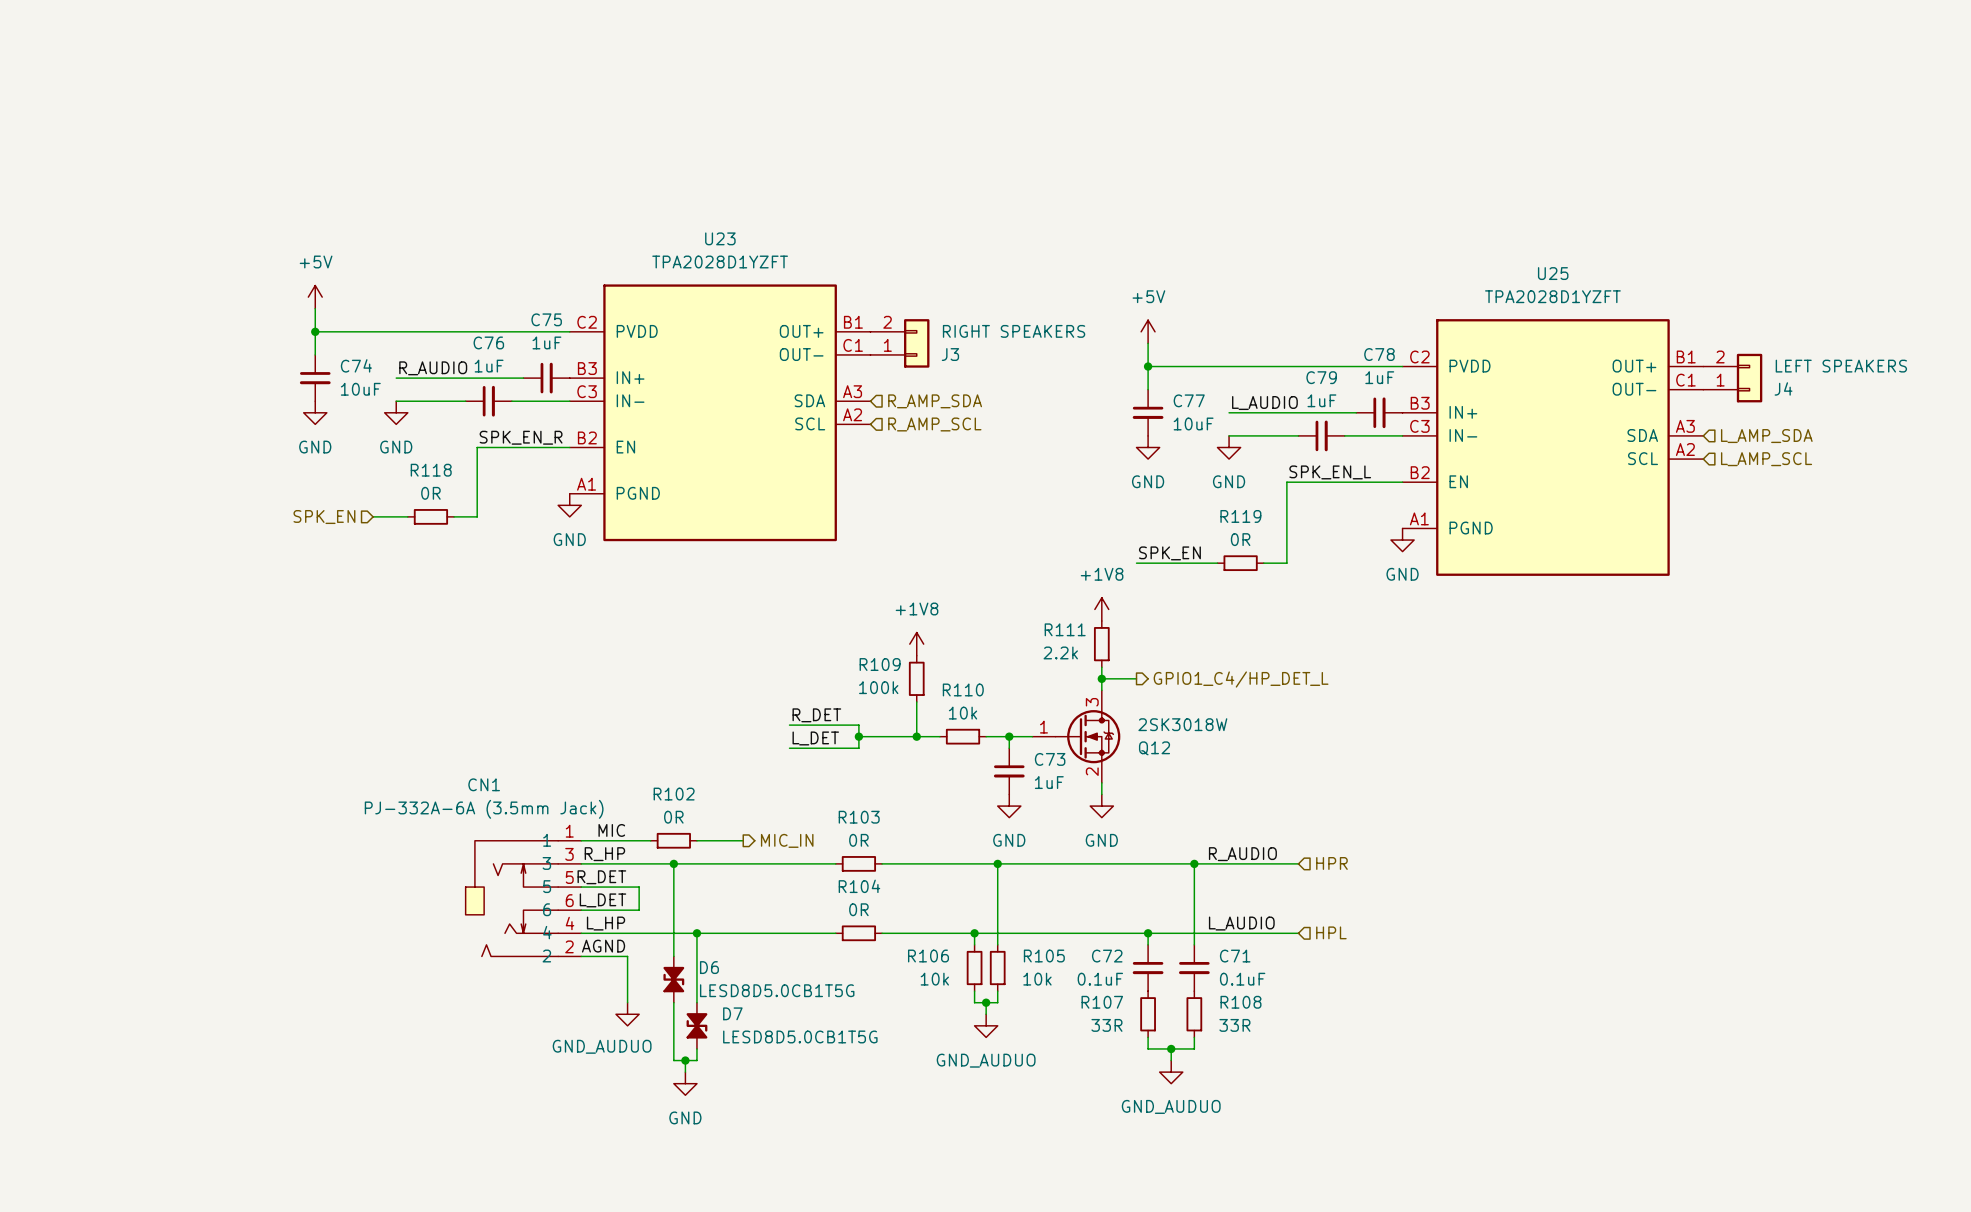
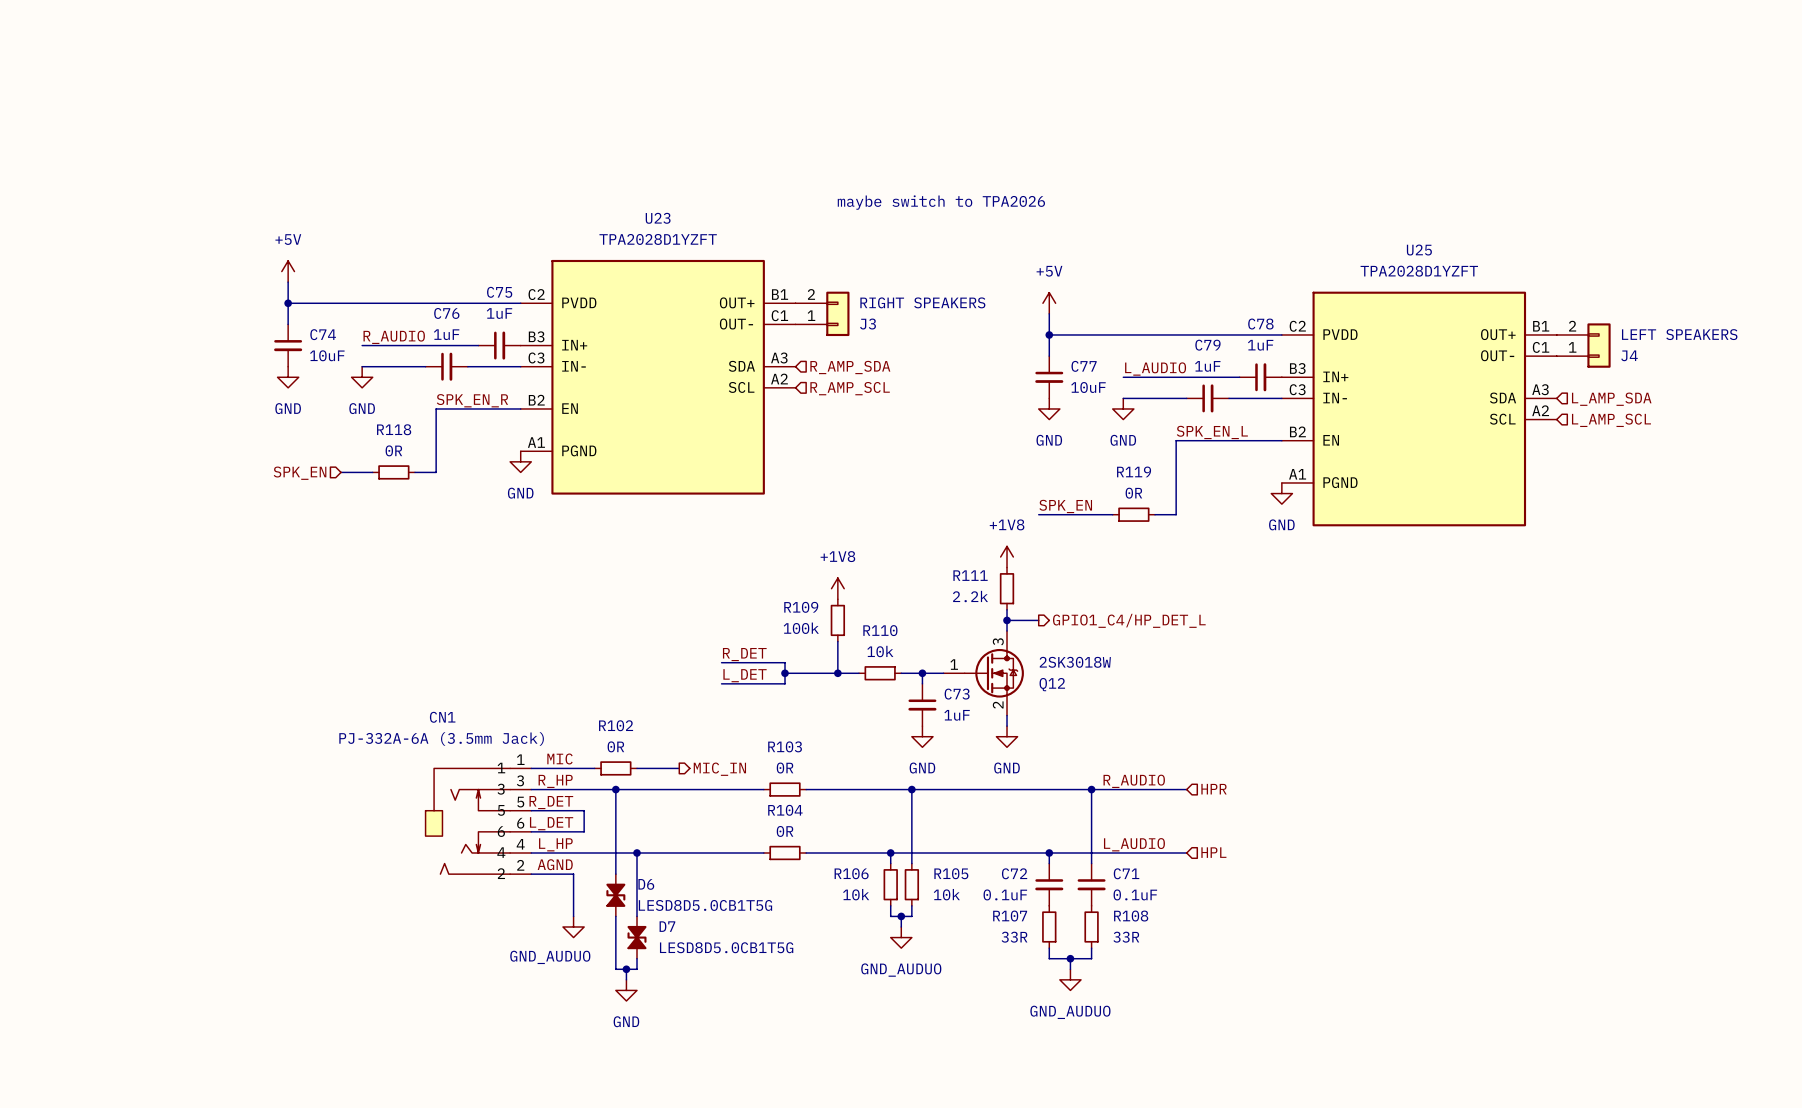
text: none -> maybe switch to TPA2026 (941, 202)

